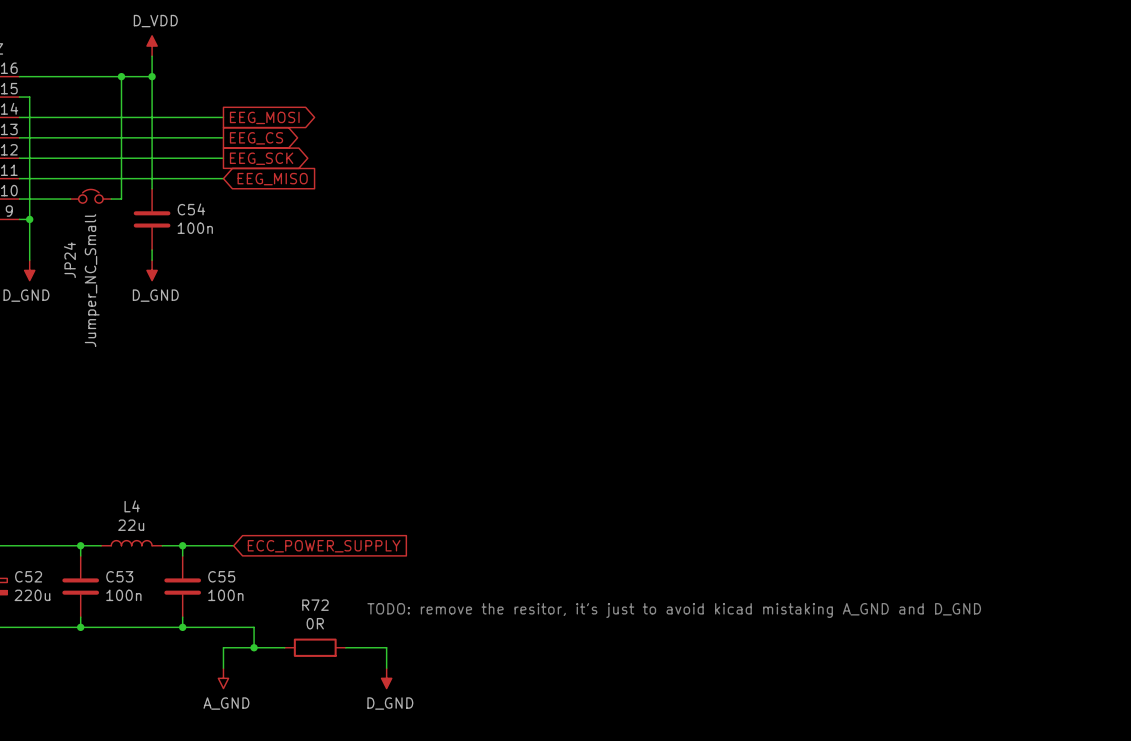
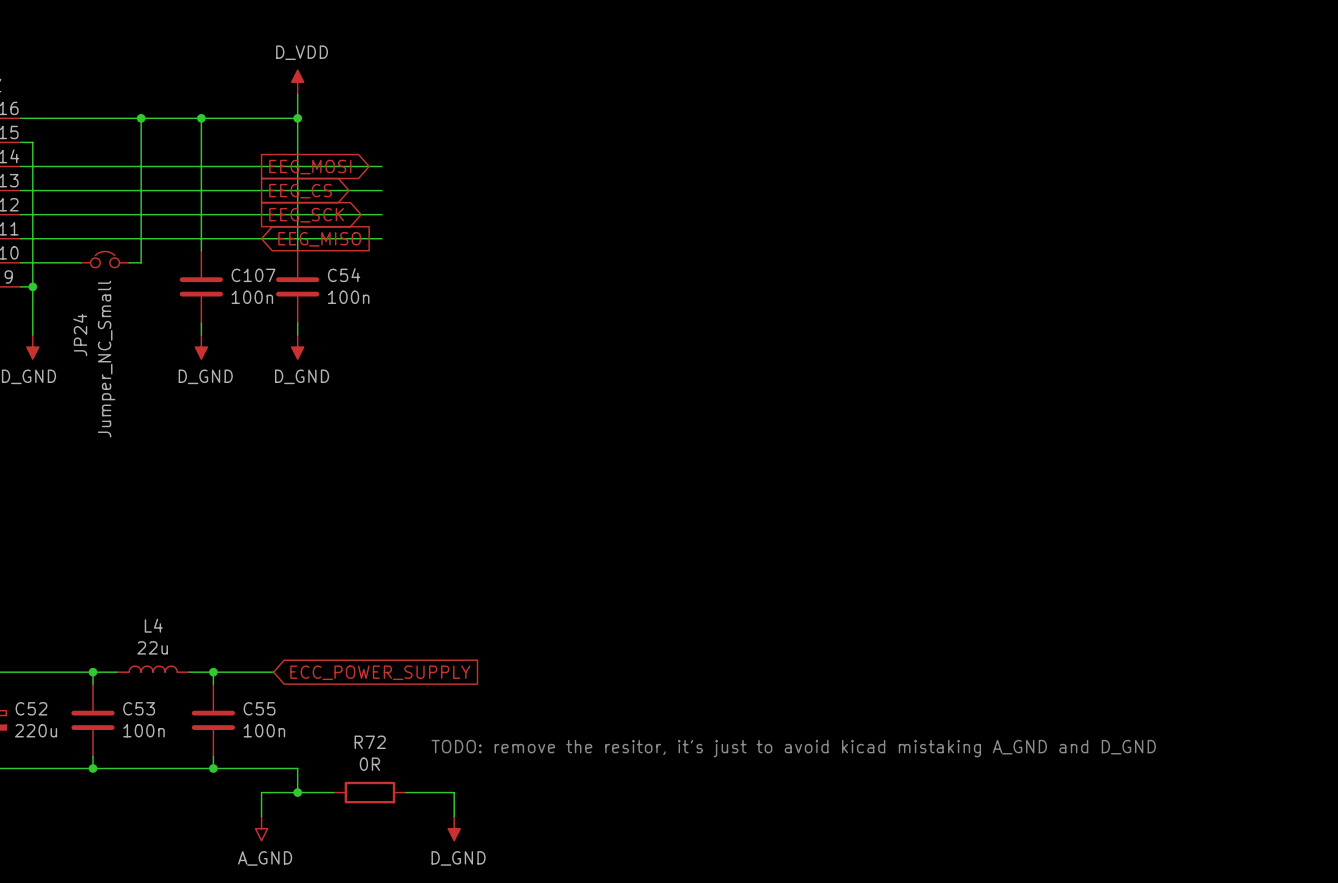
power symbol position: D_VDD (152, 46) -> D_VDD (297, 82)
wire: (152, 56) (152, 188) -> (297, 94) (297, 250)
wire: none -> (177, 118) (297, 118)
junction position: (152, 76) -> (201, 118)
wire: none -> (201, 118) (201, 250)
junction: none -> (297, 118)
wire: none -> (261, 166) (381, 166)
wire: none -> (261, 190) (381, 190)
wire: none -> (261, 214) (381, 214)
wire: none -> (261, 238) (381, 238)
C54 position: (152, 219) -> (297, 286)
C107: none -> 100n (201, 286)
wire: (152, 250) (152, 260) -> (297, 323) (297, 335)
wire: none -> (201, 323) (201, 335)
power symbol position: D_GND (152, 270) -> D_GND (201, 347)
power symbol: none -> D_GND (297, 347)

